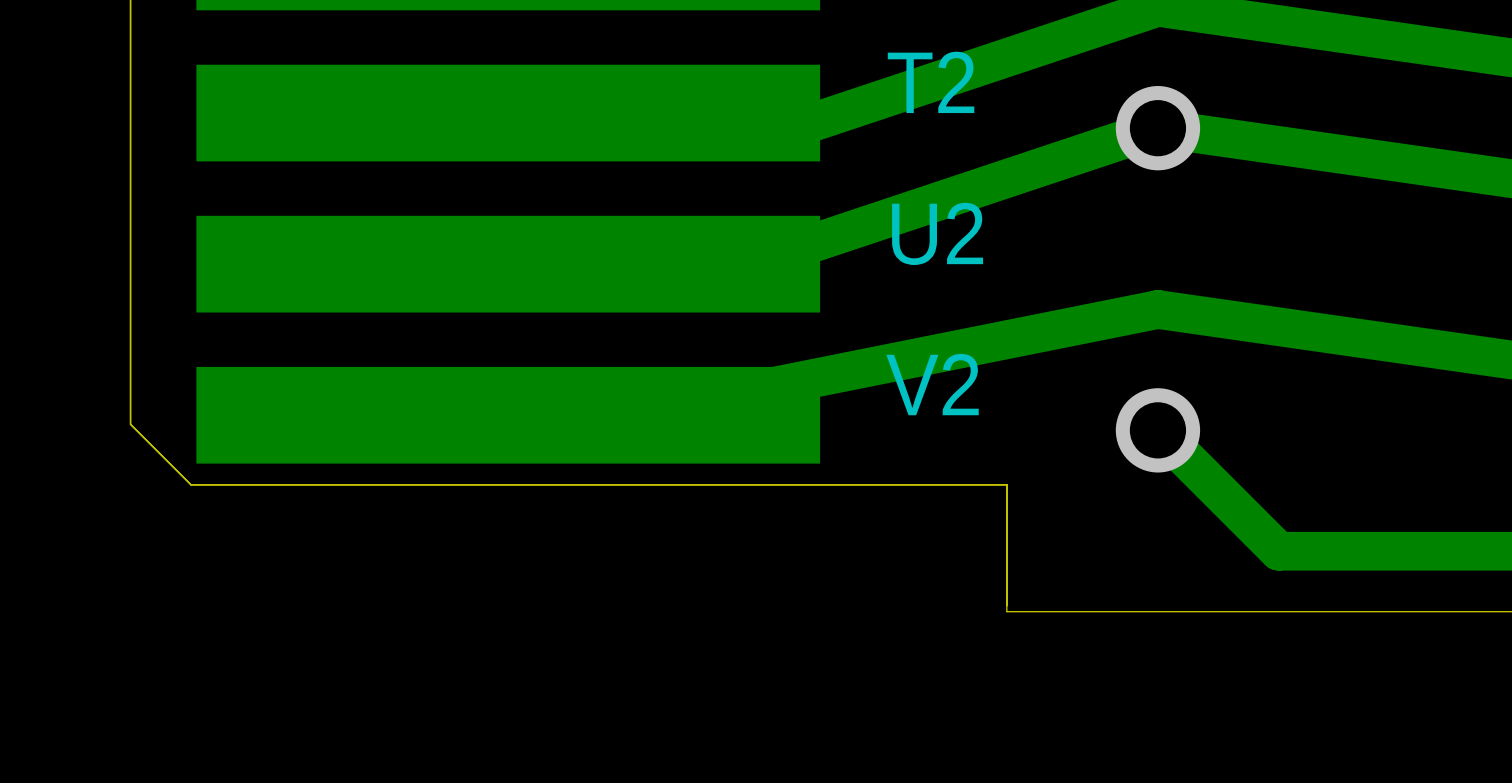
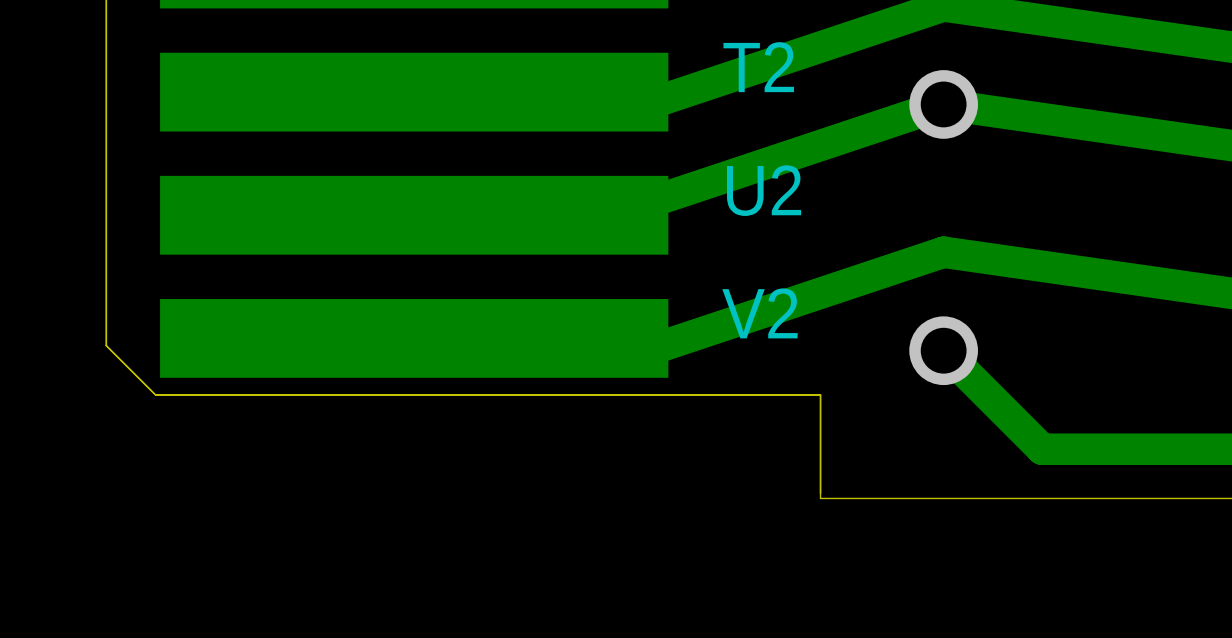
bottom track: (1157, 309) (553, 430) -> (943, 252) (648, 350) (451, 350)

